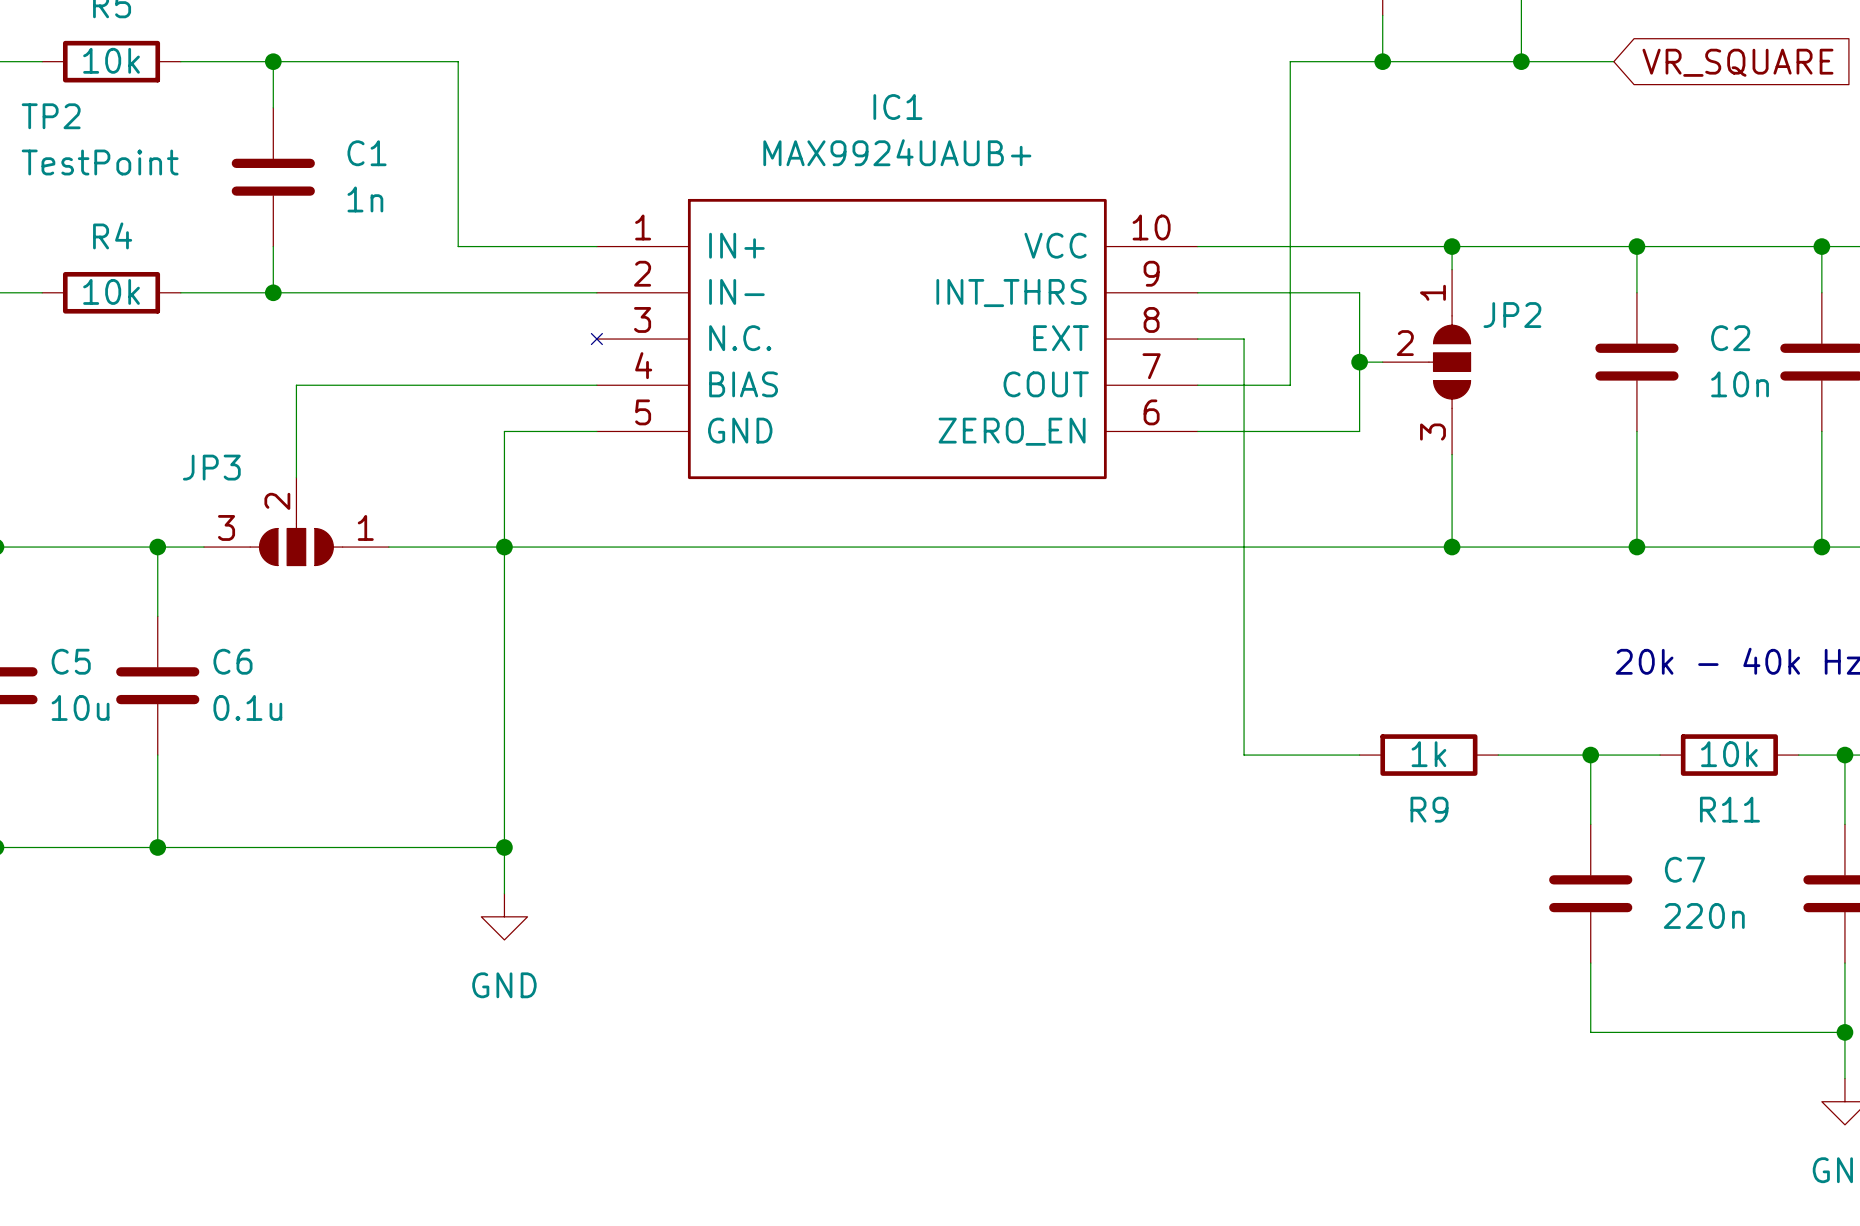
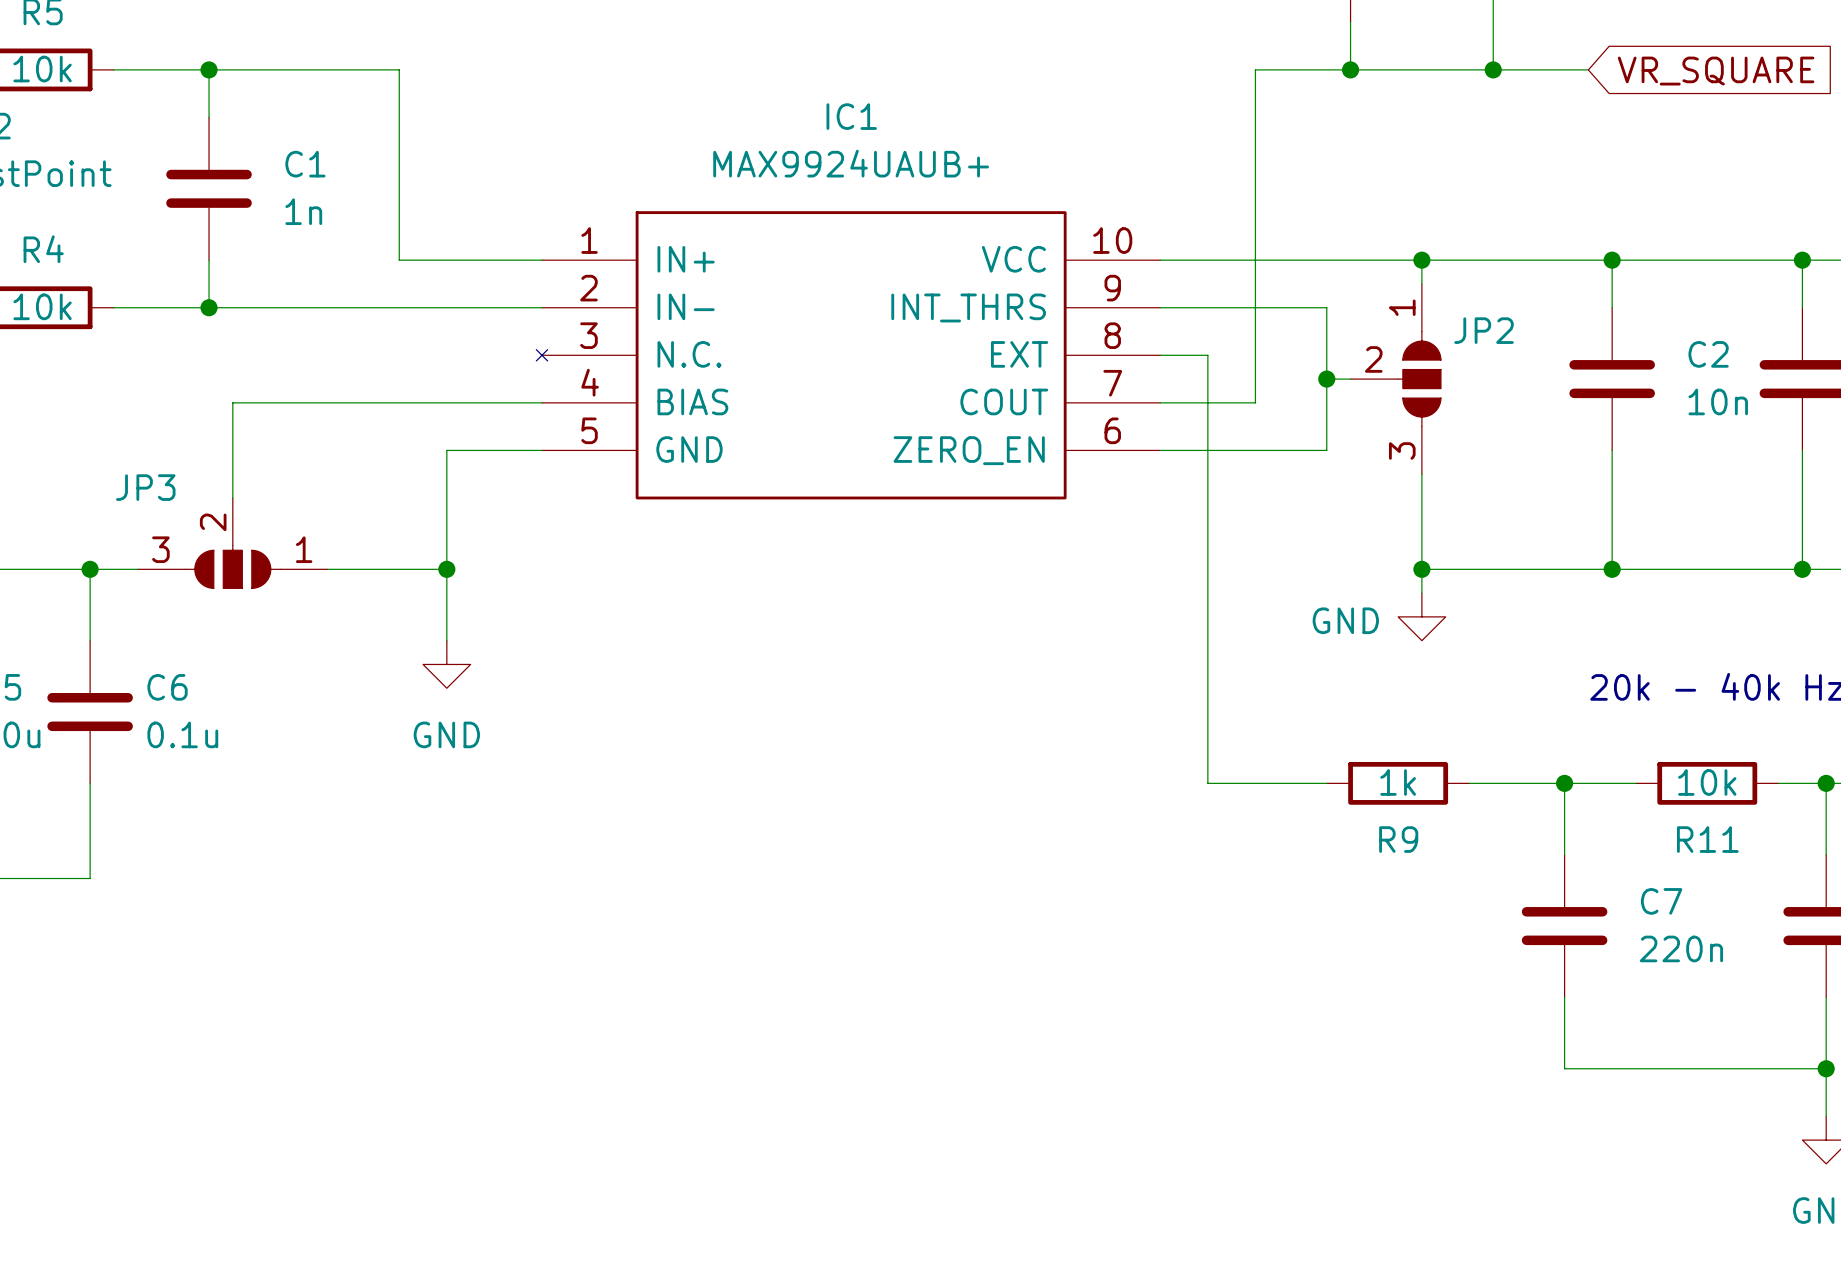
wire: (504, 547) (1452, 547) -> (1421, 593) (1421, 569)
power symbol: none -> GND (1421, 616)
wire: (504, 616) (504, 893) -> none
wire: (157, 847) (504, 847) -> none
junction: (157, 847) -> none
junction: (504, 847) -> none
power symbol position: GND (504, 916) -> GND (446, 664)

